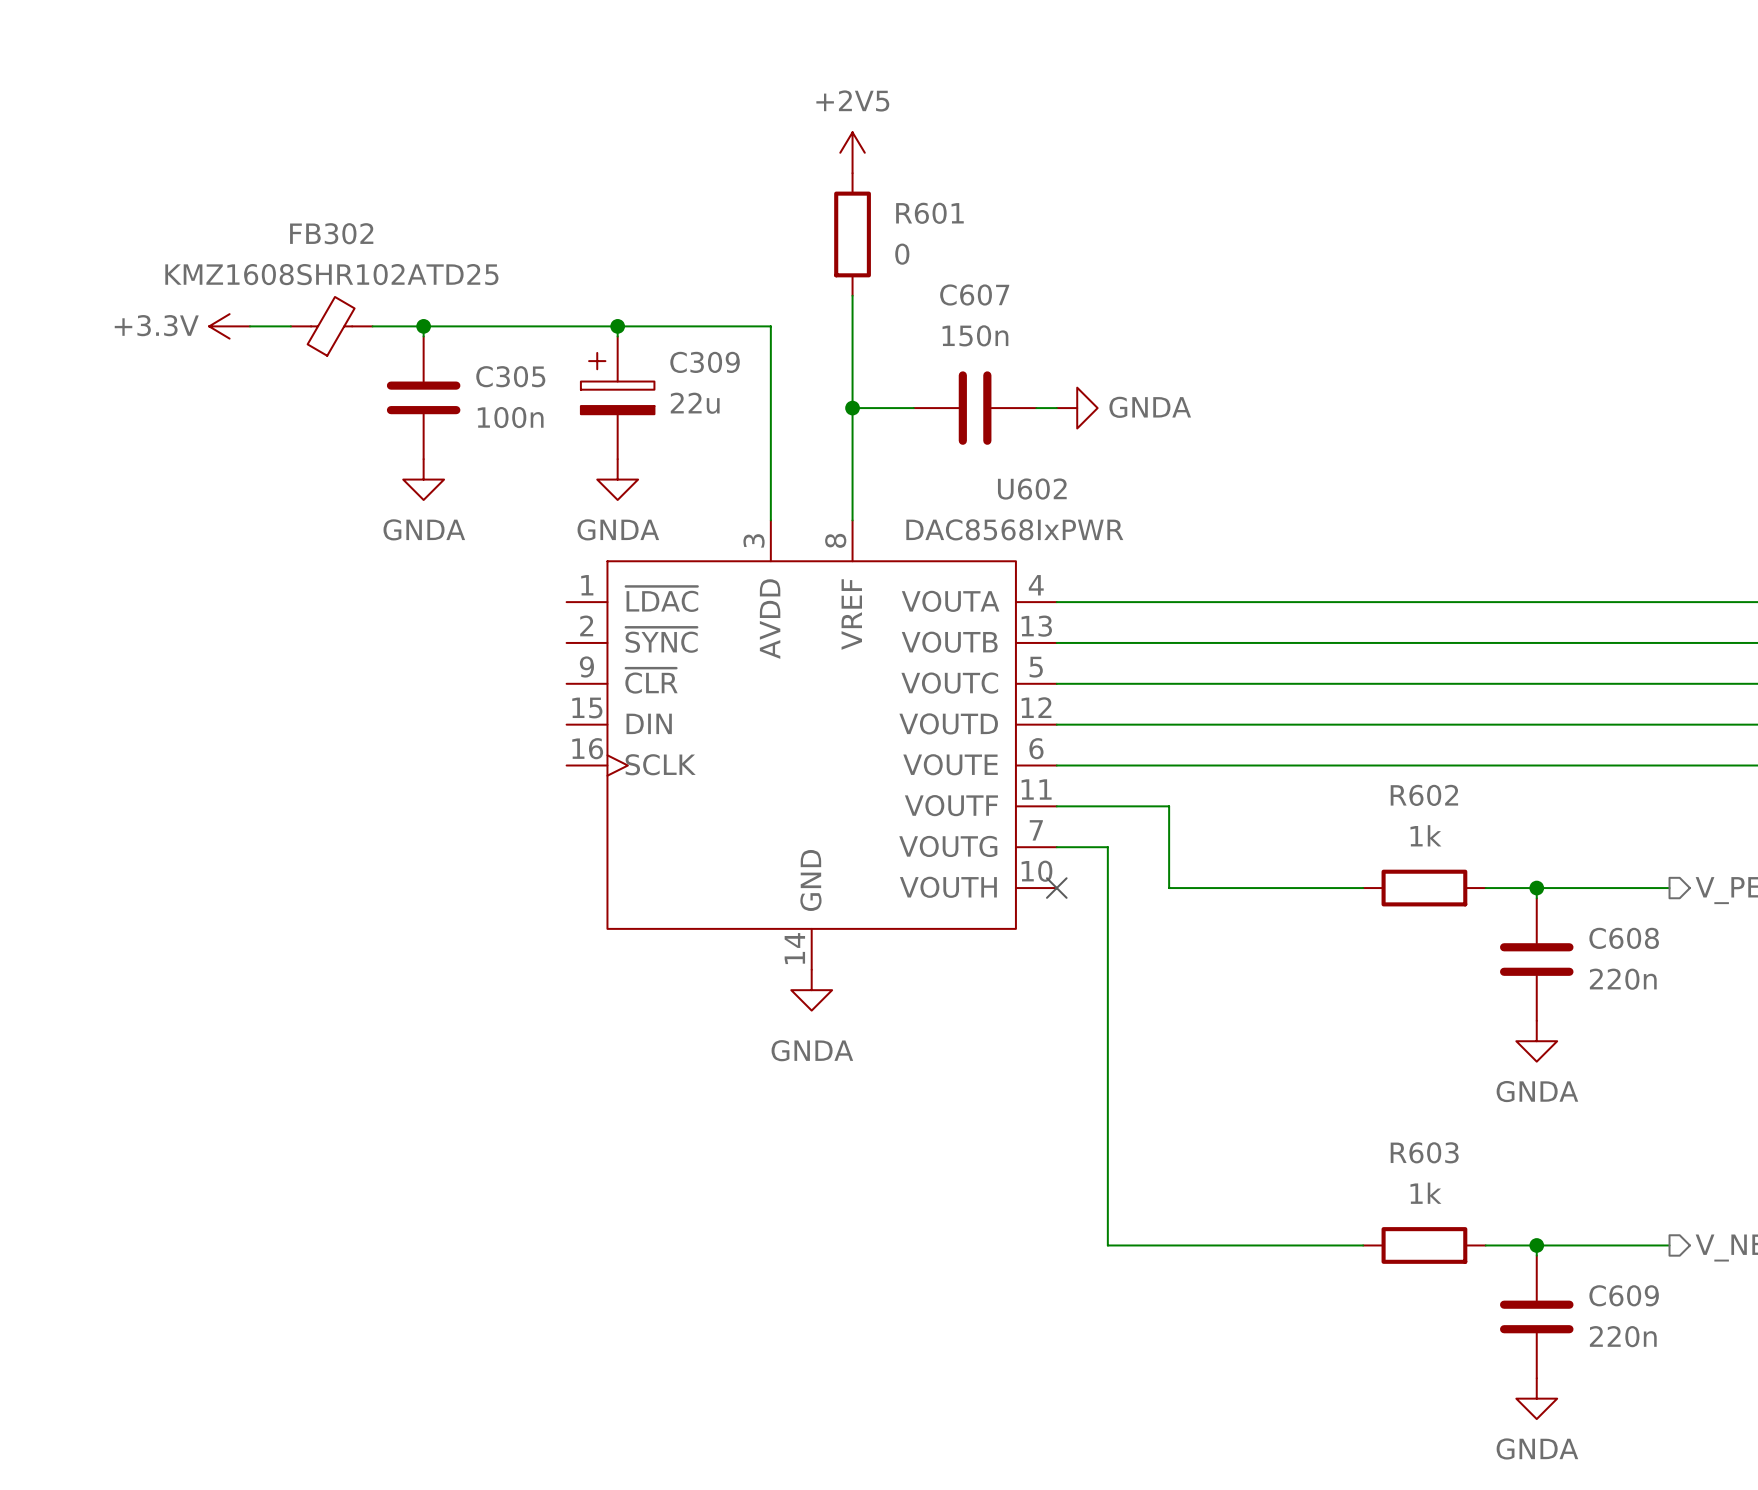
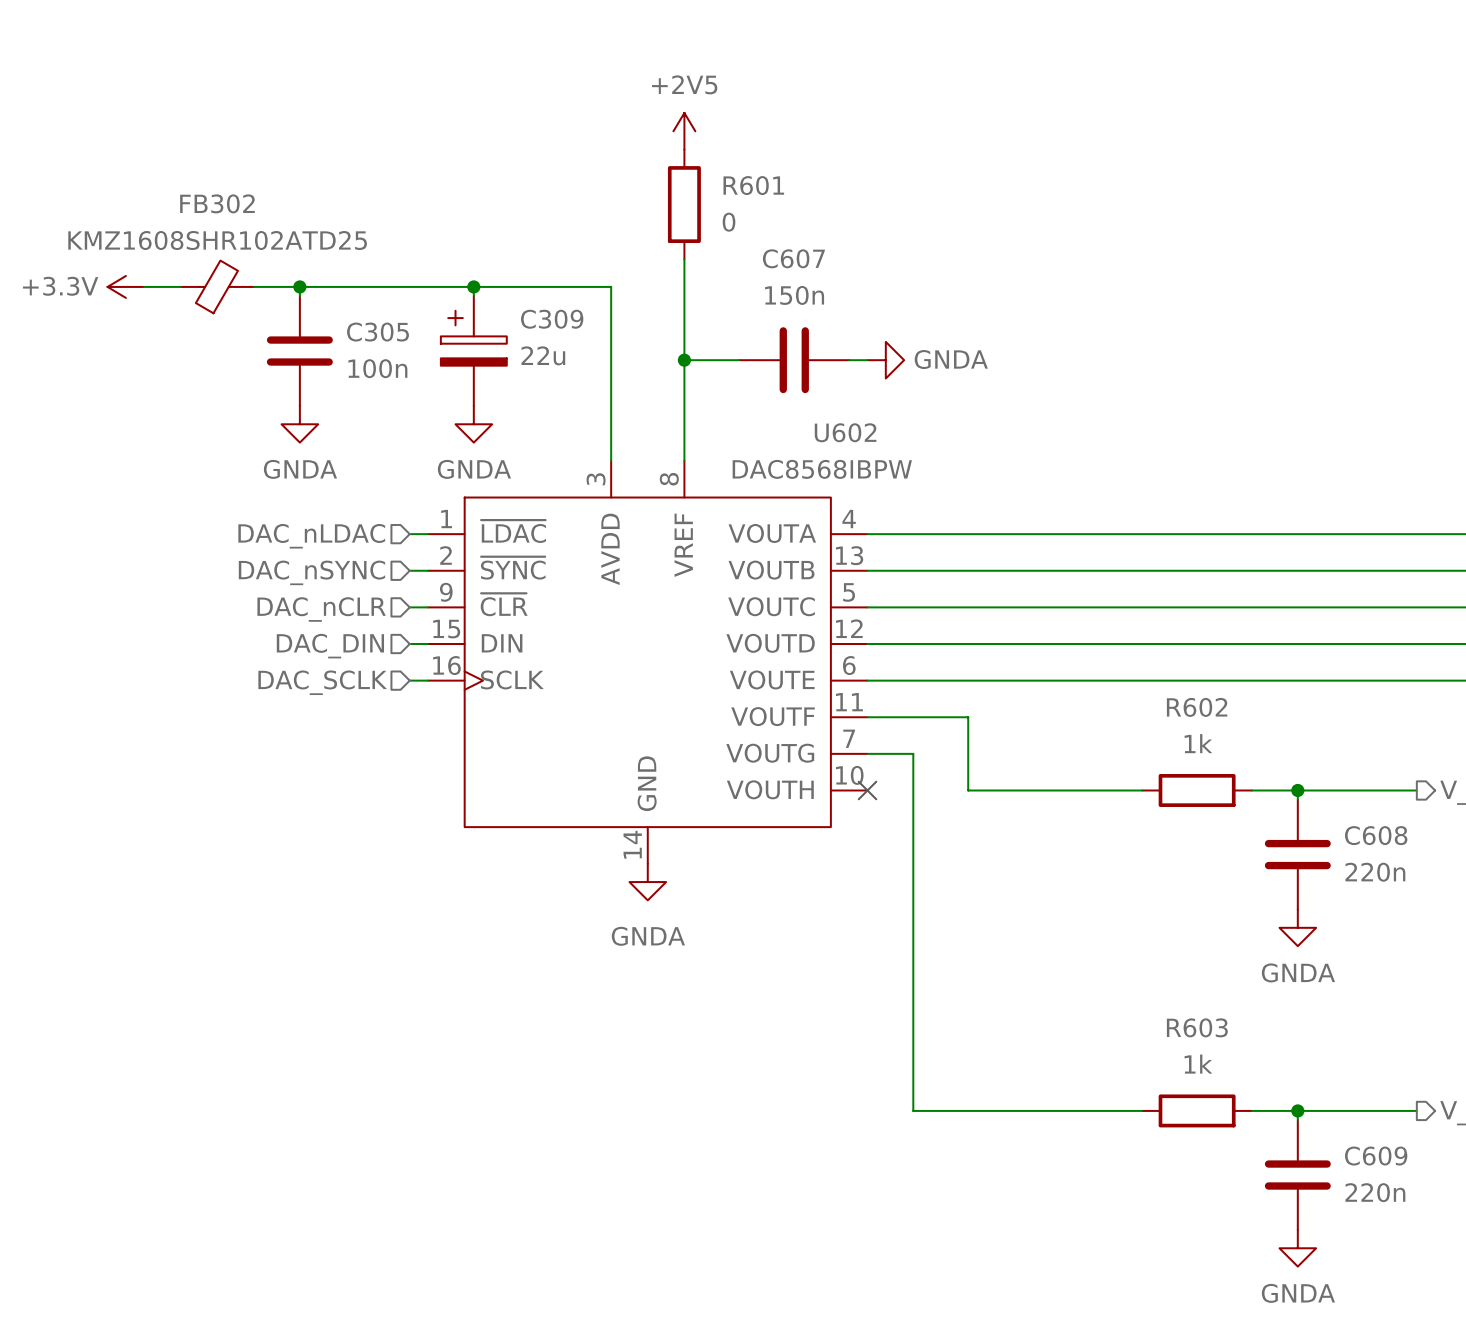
U602 value: DAC8568IxPWR (1014, 529) -> DAC8568IBPW (822, 469)
wire: none -> (409, 534) (428, 534)
hierarchical label: none -> DAC_nLDAC (311, 536)
wire: none -> (409, 570) (428, 570)
hierarchical label: none -> DAC_nSYNC (311, 572)
wire: none -> (409, 607) (428, 607)
hierarchical label: none -> DAC_nCLR (321, 609)
wire: none -> (409, 644) (428, 644)
hierarchical label: none -> DAC_DIN (330, 646)
wire: none -> (409, 680) (428, 680)
hierarchical label: none -> DAC_SCLK (322, 682)

